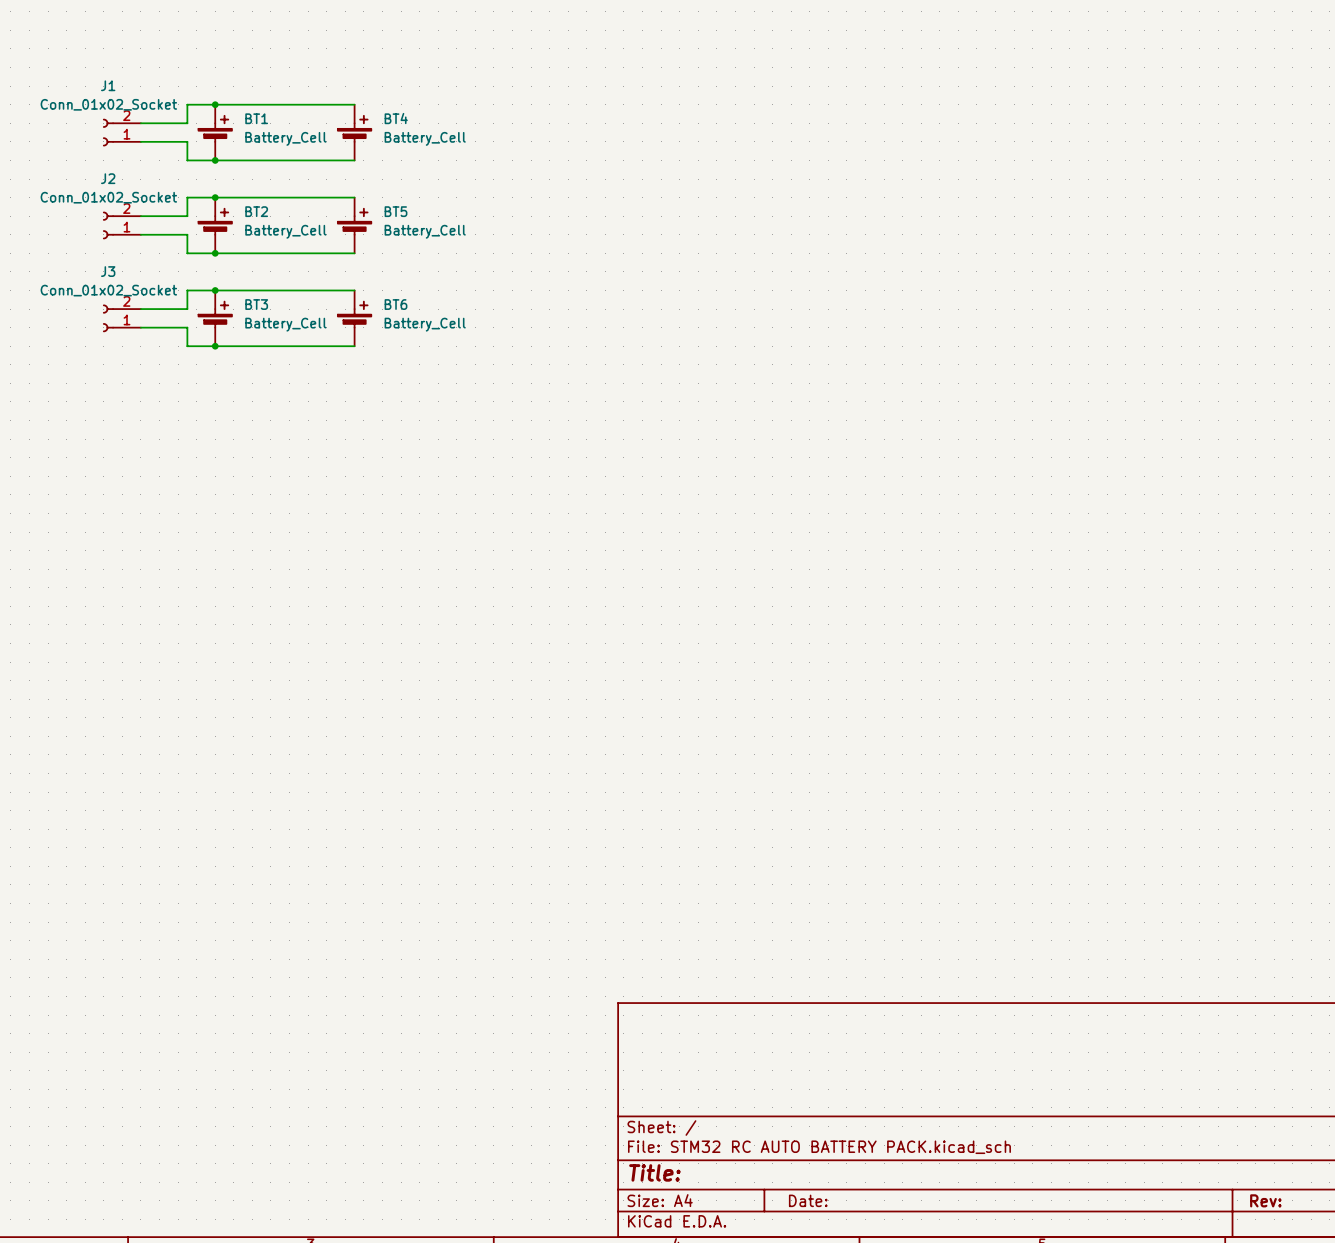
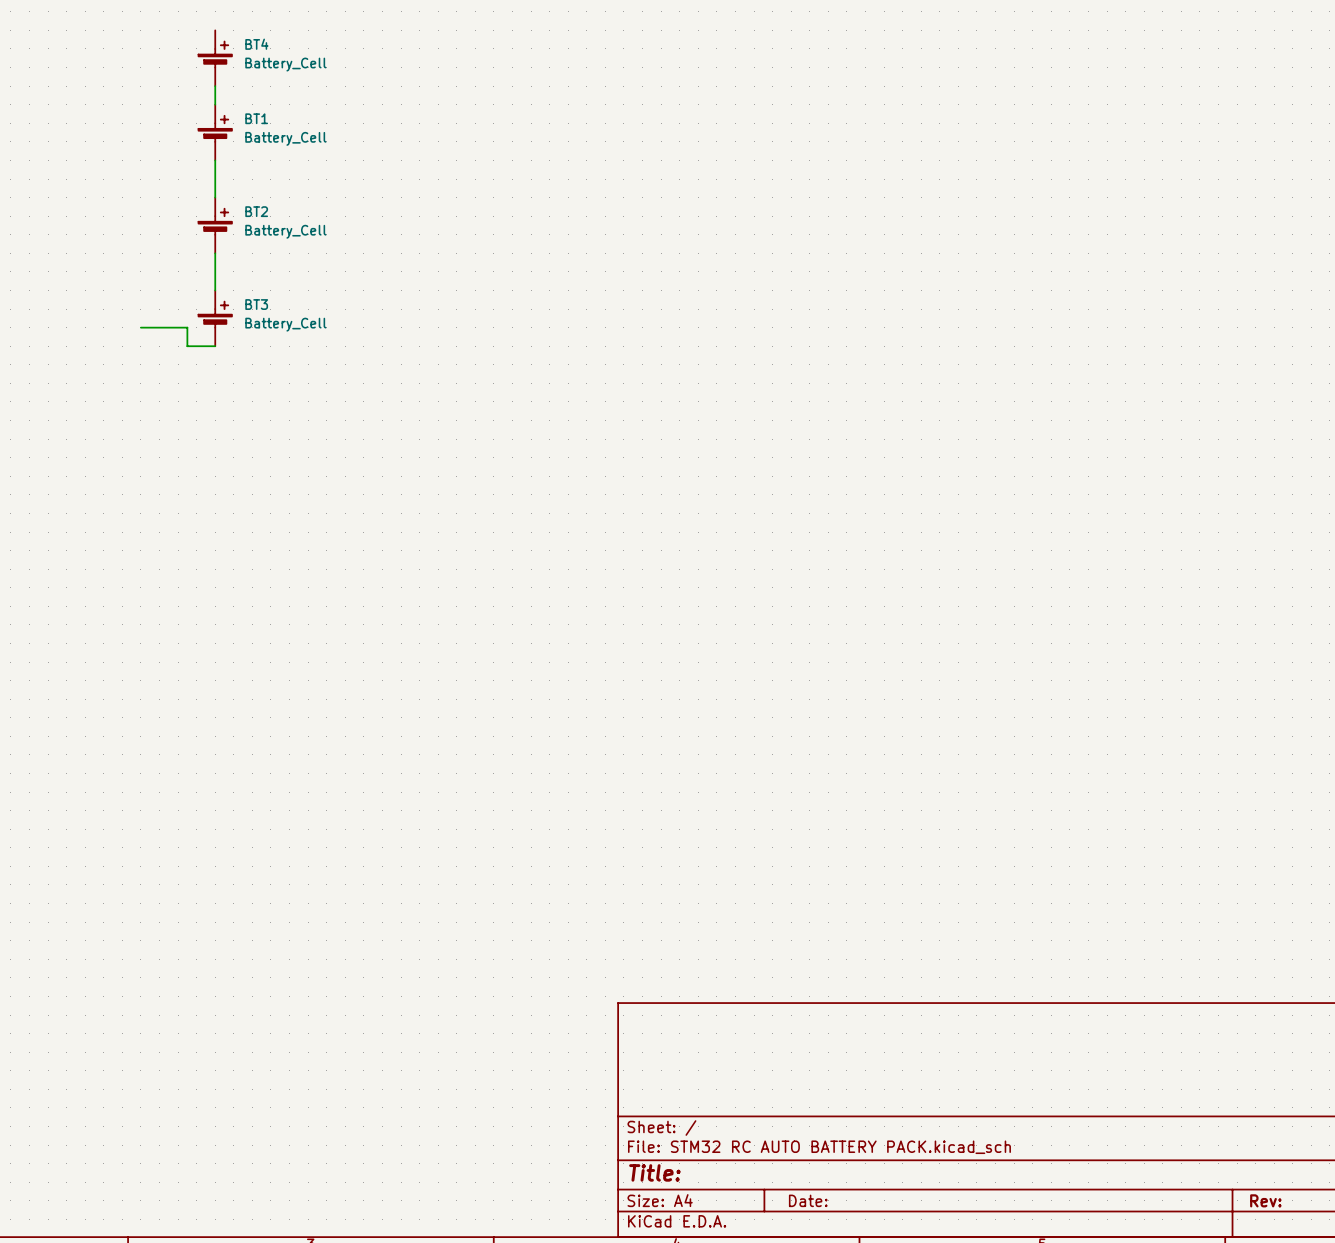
wire: none -> (215, 86) (215, 104)
junction: (215, 104) -> none
wire: (354, 104) (187, 104) (187, 123) (140, 123) -> none
J1: Conn_01x02_Socket (122, 132) -> none
BT4 position: (354, 132) -> (215, 58)
wire: (140, 141) (187, 141) (187, 160) (354, 160) -> none
wire: none -> (215, 160) (215, 197)
junction: (215, 160) -> none
junction: (215, 197) -> none
wire: (354, 197) (187, 197) (187, 216) (140, 216) -> none
J2: Conn_01x02_Socket (122, 225) -> none
BT5: Battery_Cell (354, 225) -> none
wire: (140, 234) (187, 234) (187, 253) (354, 253) -> none
wire: none -> (215, 253) (215, 290)
junction: (215, 253) -> none
junction: (215, 290) -> none
wire: (354, 290) (187, 290) (187, 309) (140, 309) -> none
J3: Conn_01x02_Socket (122, 318) -> none
BT6: Battery_Cell (354, 318) -> none
wire: (215, 346) (354, 346) -> none
junction: (215, 346) -> none

